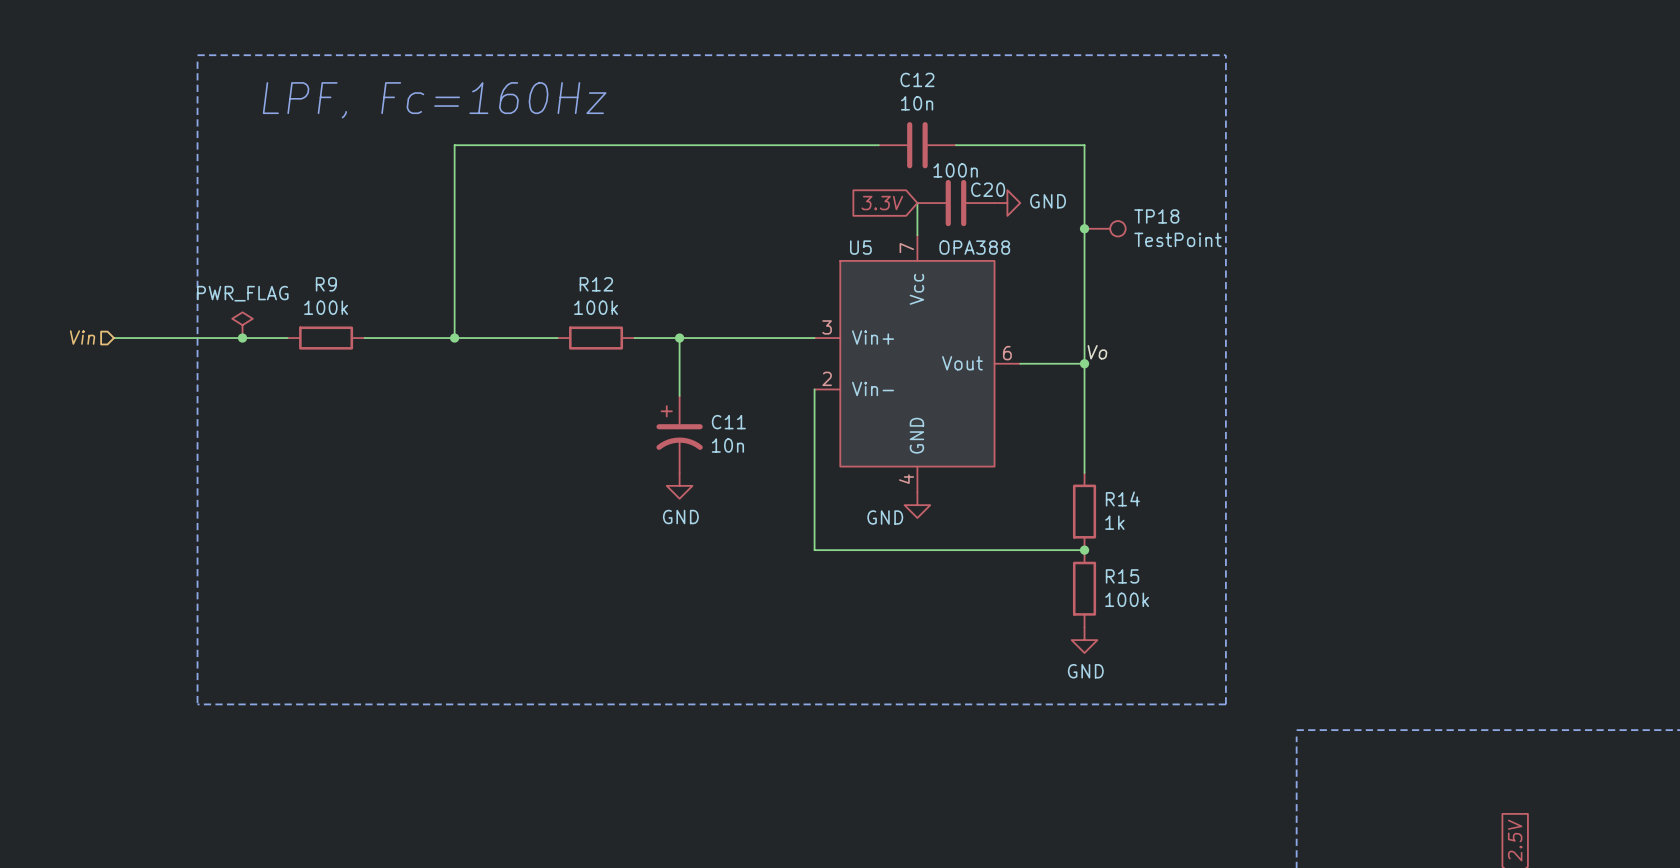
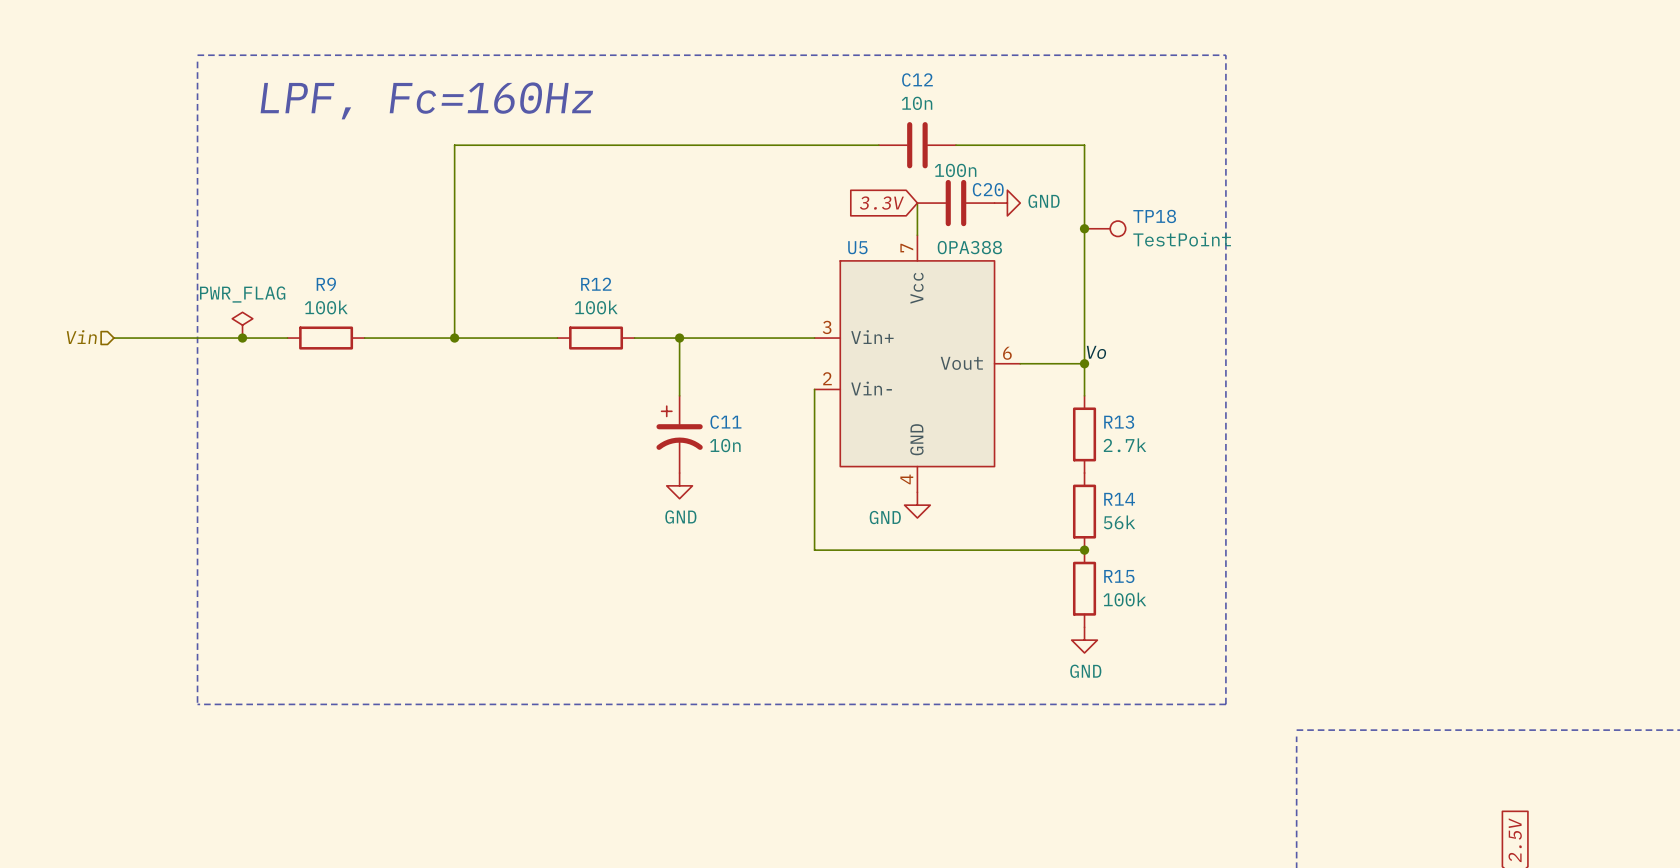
wire: (1084, 395) (1084, 473) -> none
R13: none -> 2.7k (1084, 434)
R14 value: 1k (1114, 522) -> 56k (1119, 522)

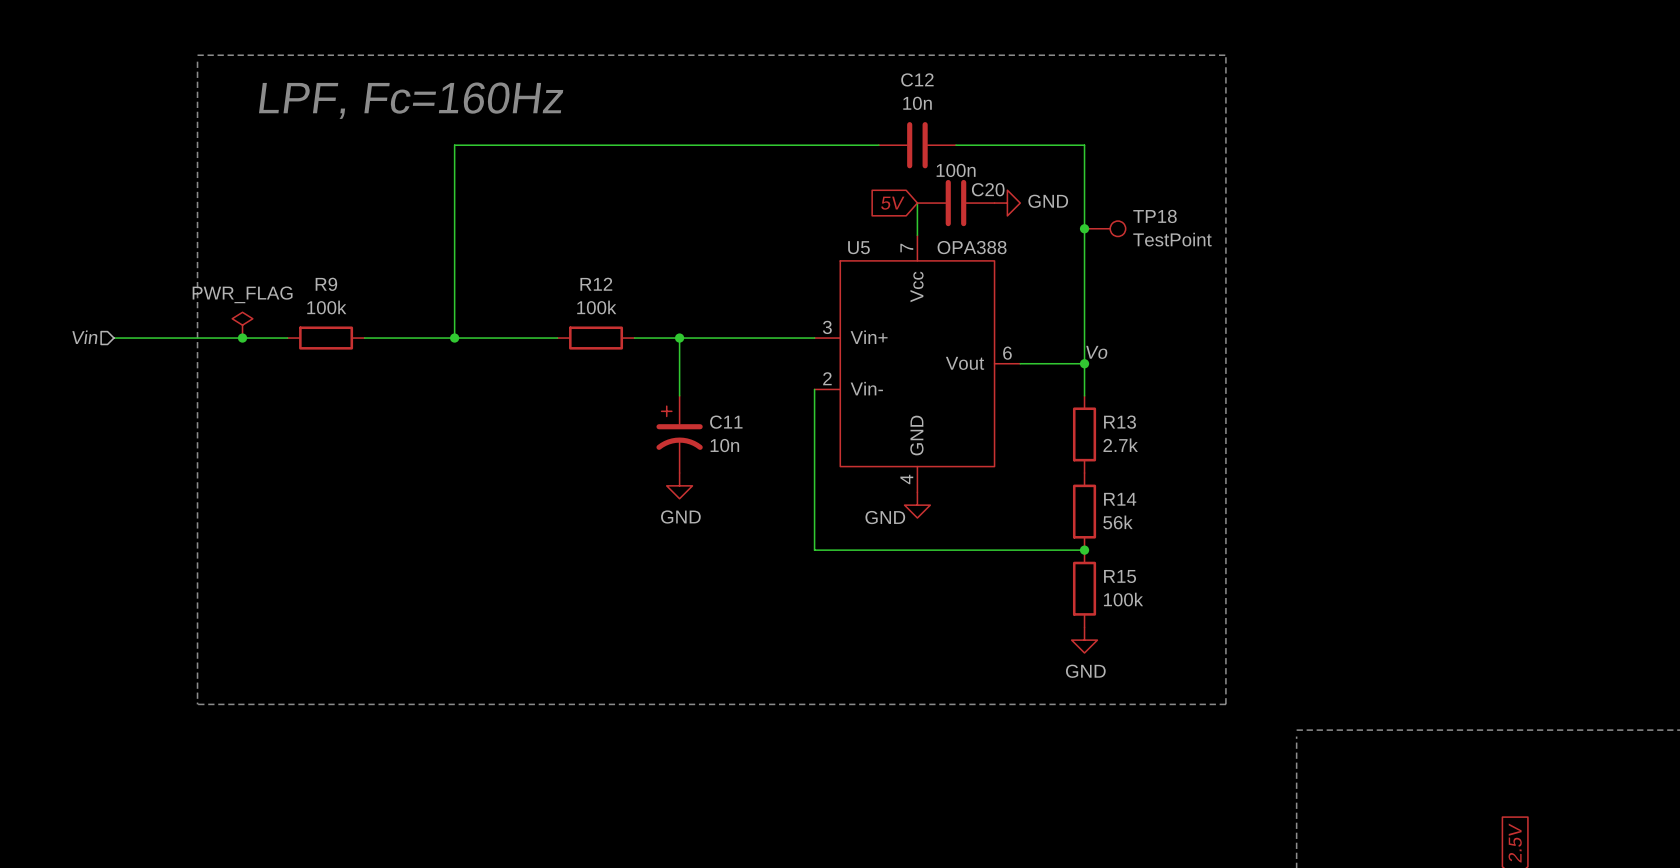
global label: 3.3V (881, 203) -> 5V (892, 203)

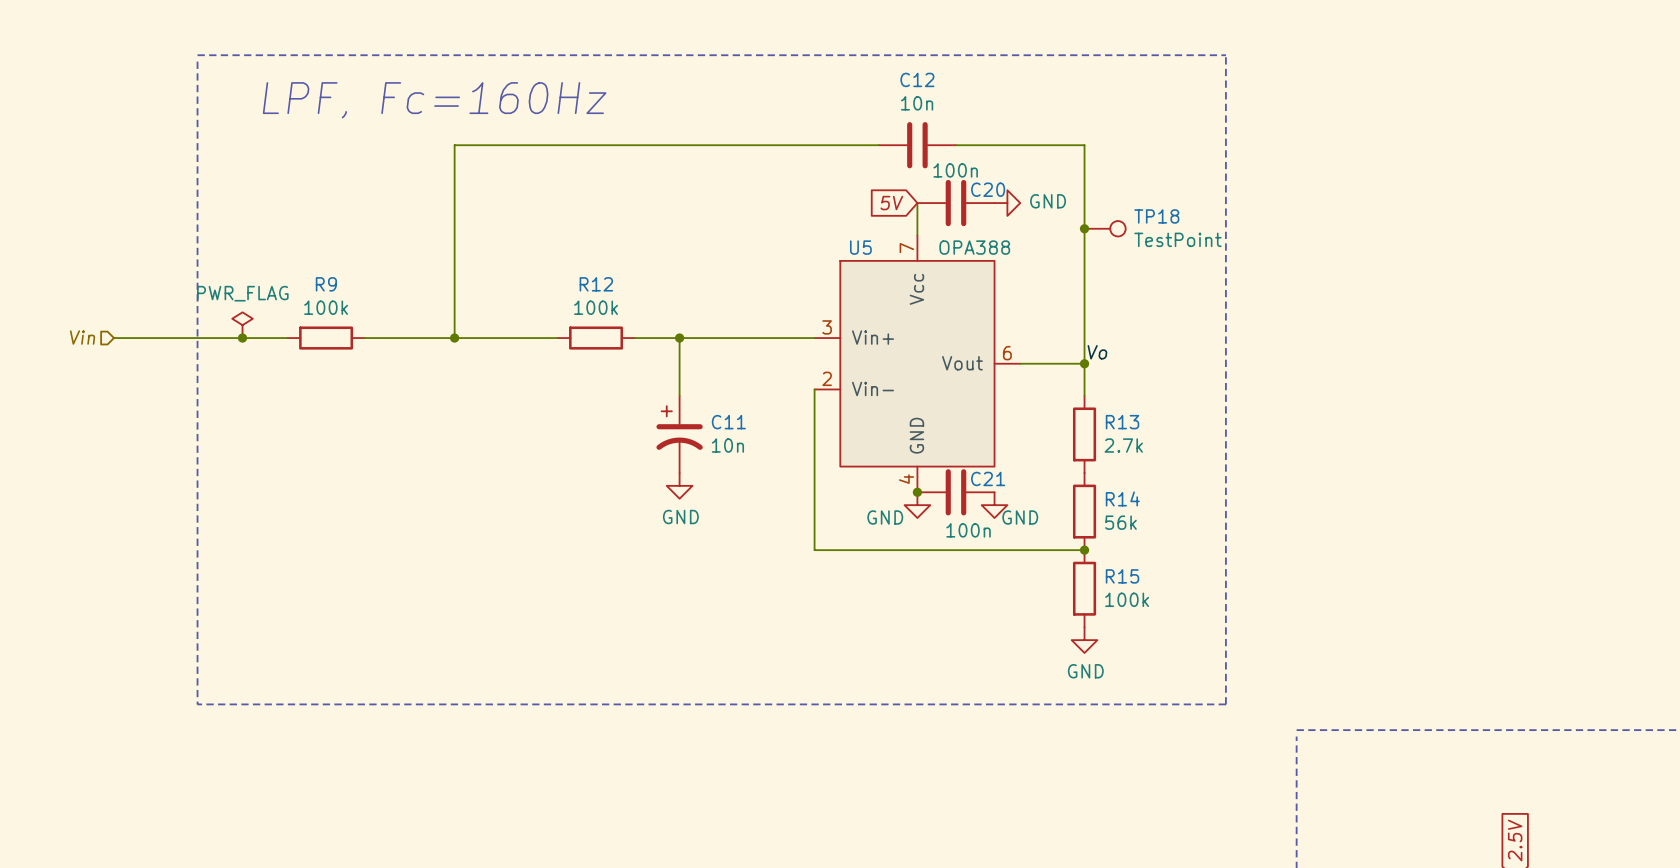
junction: none -> (917, 492)
C21: none -> 100n (955, 492)
power symbol: none -> GND (994, 505)

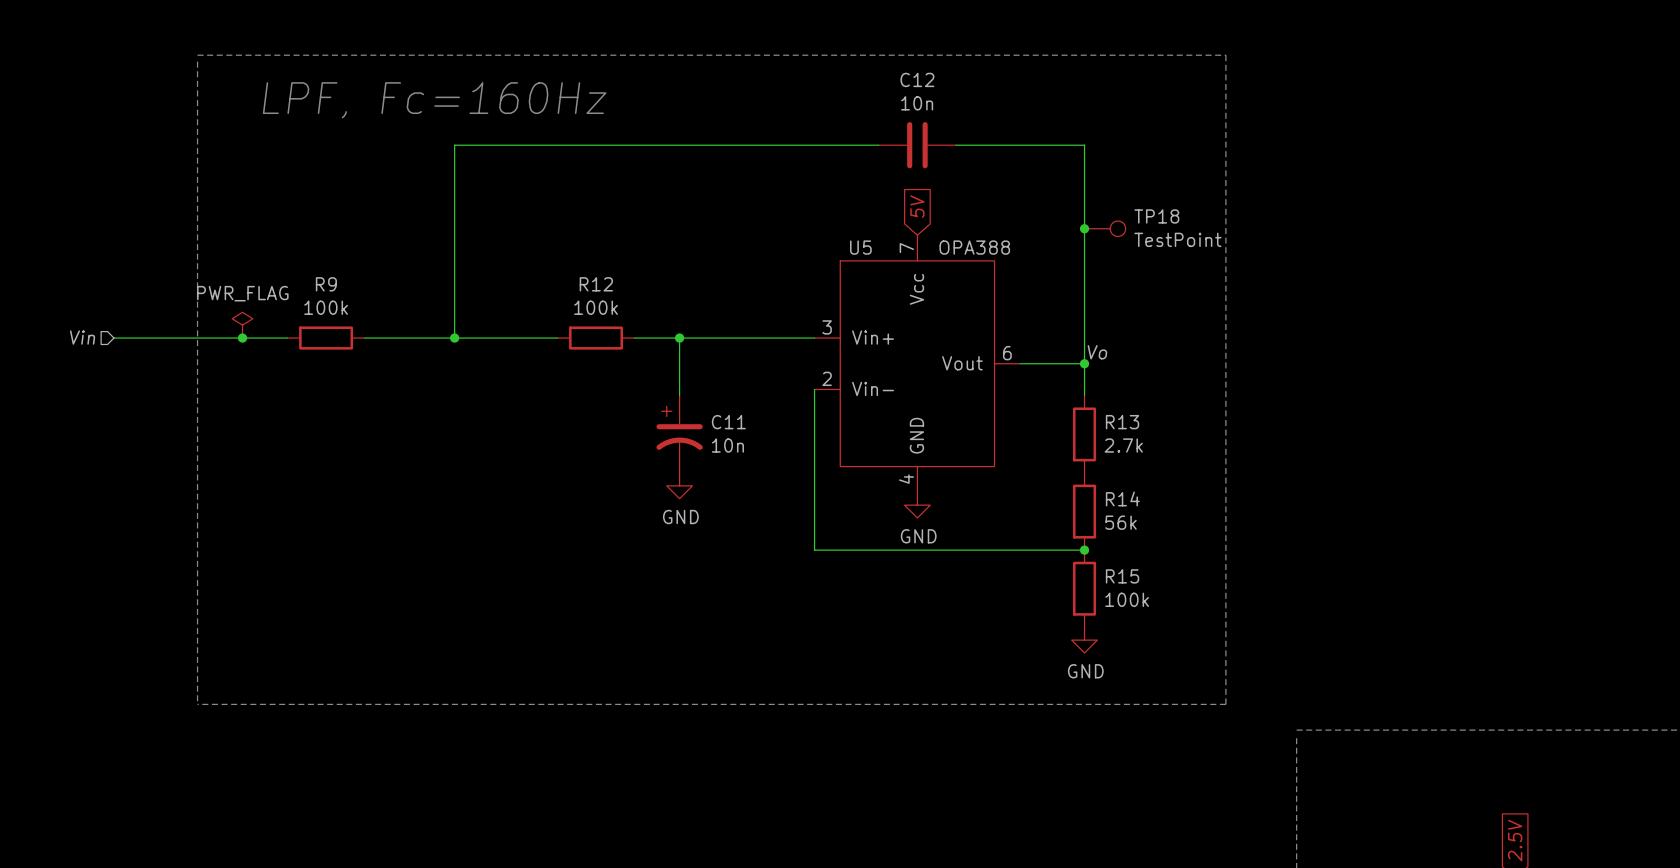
global label rotation: 0° (891, 203) -> 90° clockwise (917, 206)
wire: (917, 203) (917, 235) -> none
C20: 100n (955, 203) -> none
power symbol: GND (1007, 203) -> none
junction: (917, 492) -> none
C21: 100n (955, 492) -> none
power symbol: GND (994, 505) -> none
power symbol text position: GND (885, 517) -> GND (918, 536)

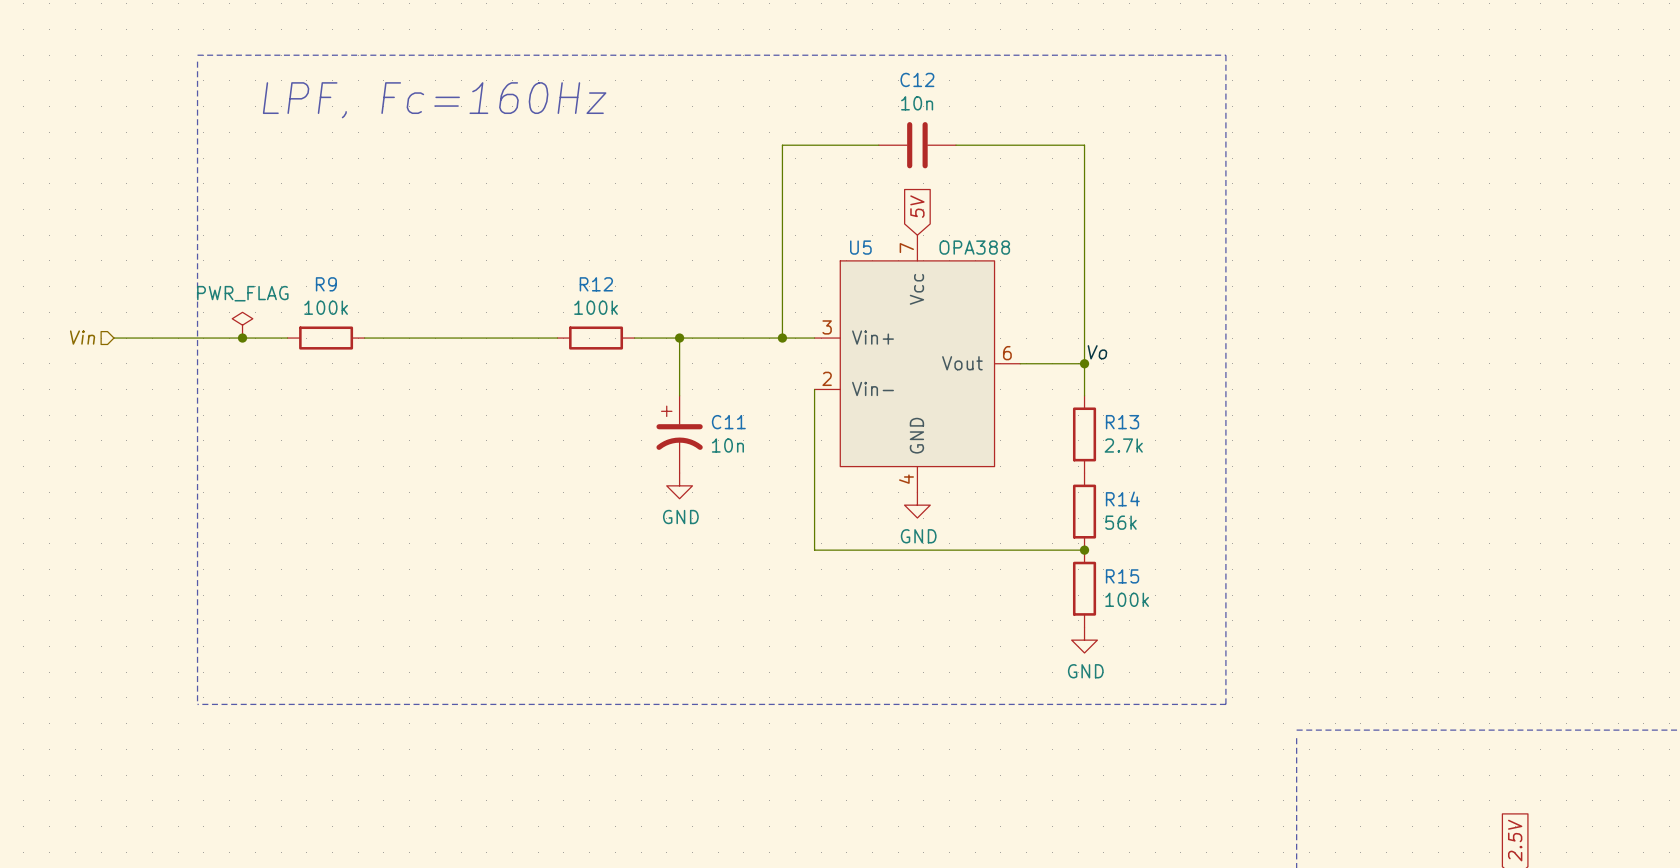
wire: (782, 145) (454, 145) (454, 338) -> (782, 145) (782, 338)
junction: (1084, 228) -> none
TP18: TestPoint (1105, 228) -> none
junction: (454, 338) -> none
junction: none -> (782, 338)

